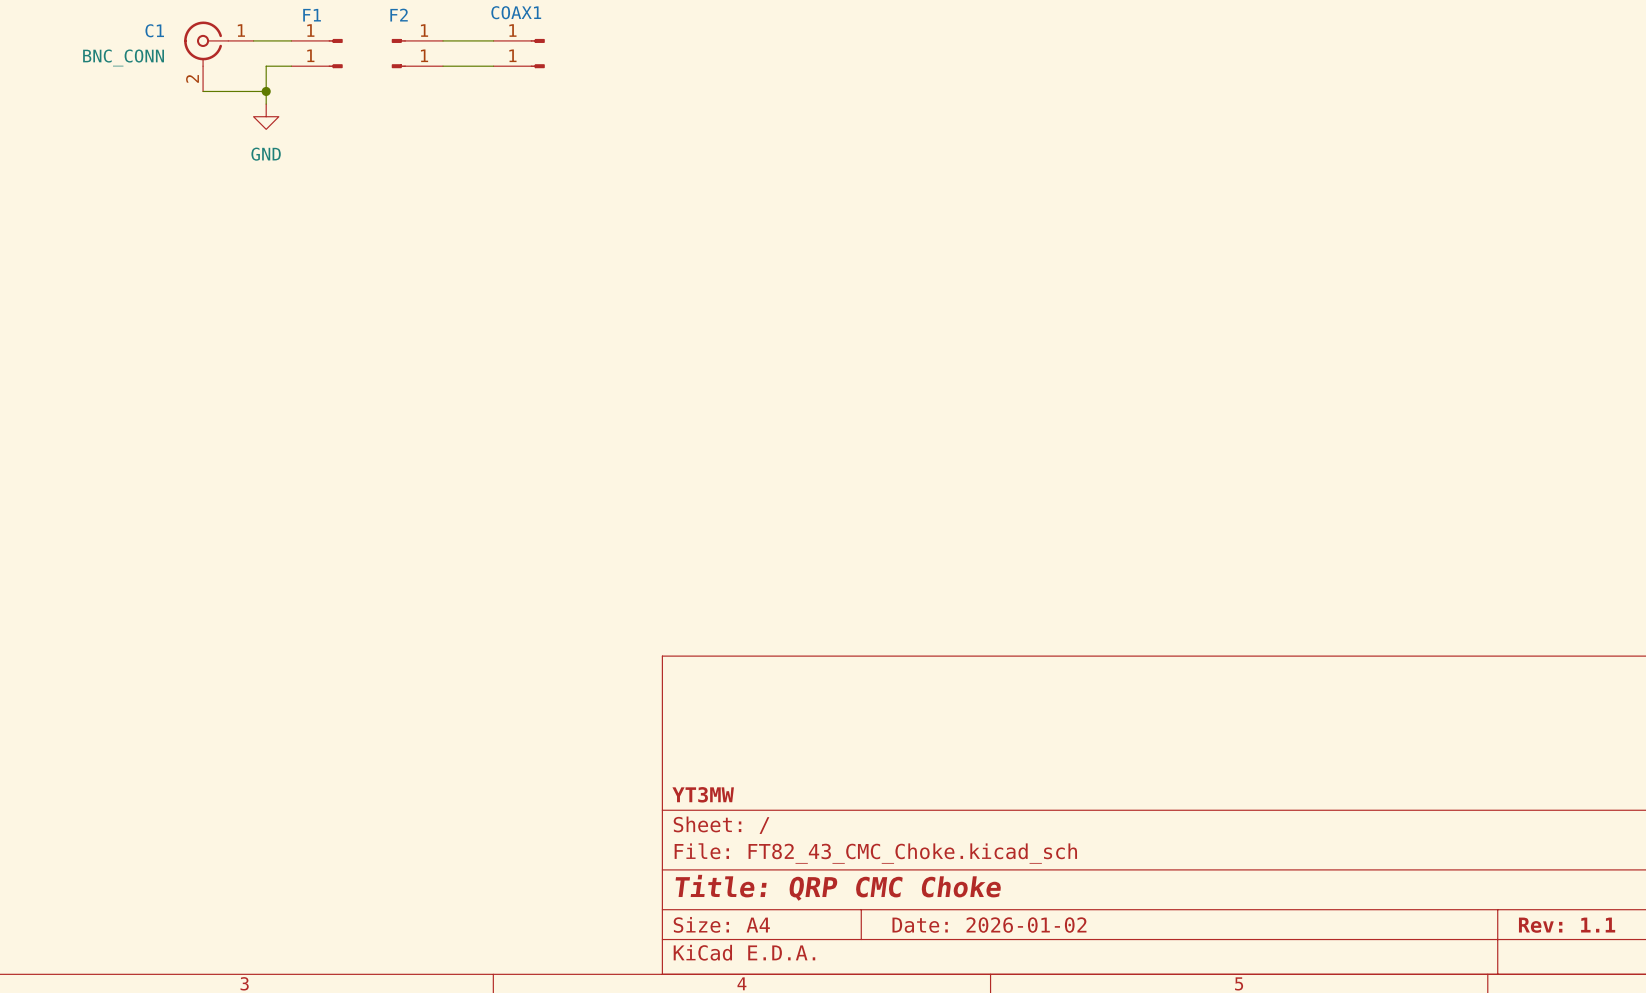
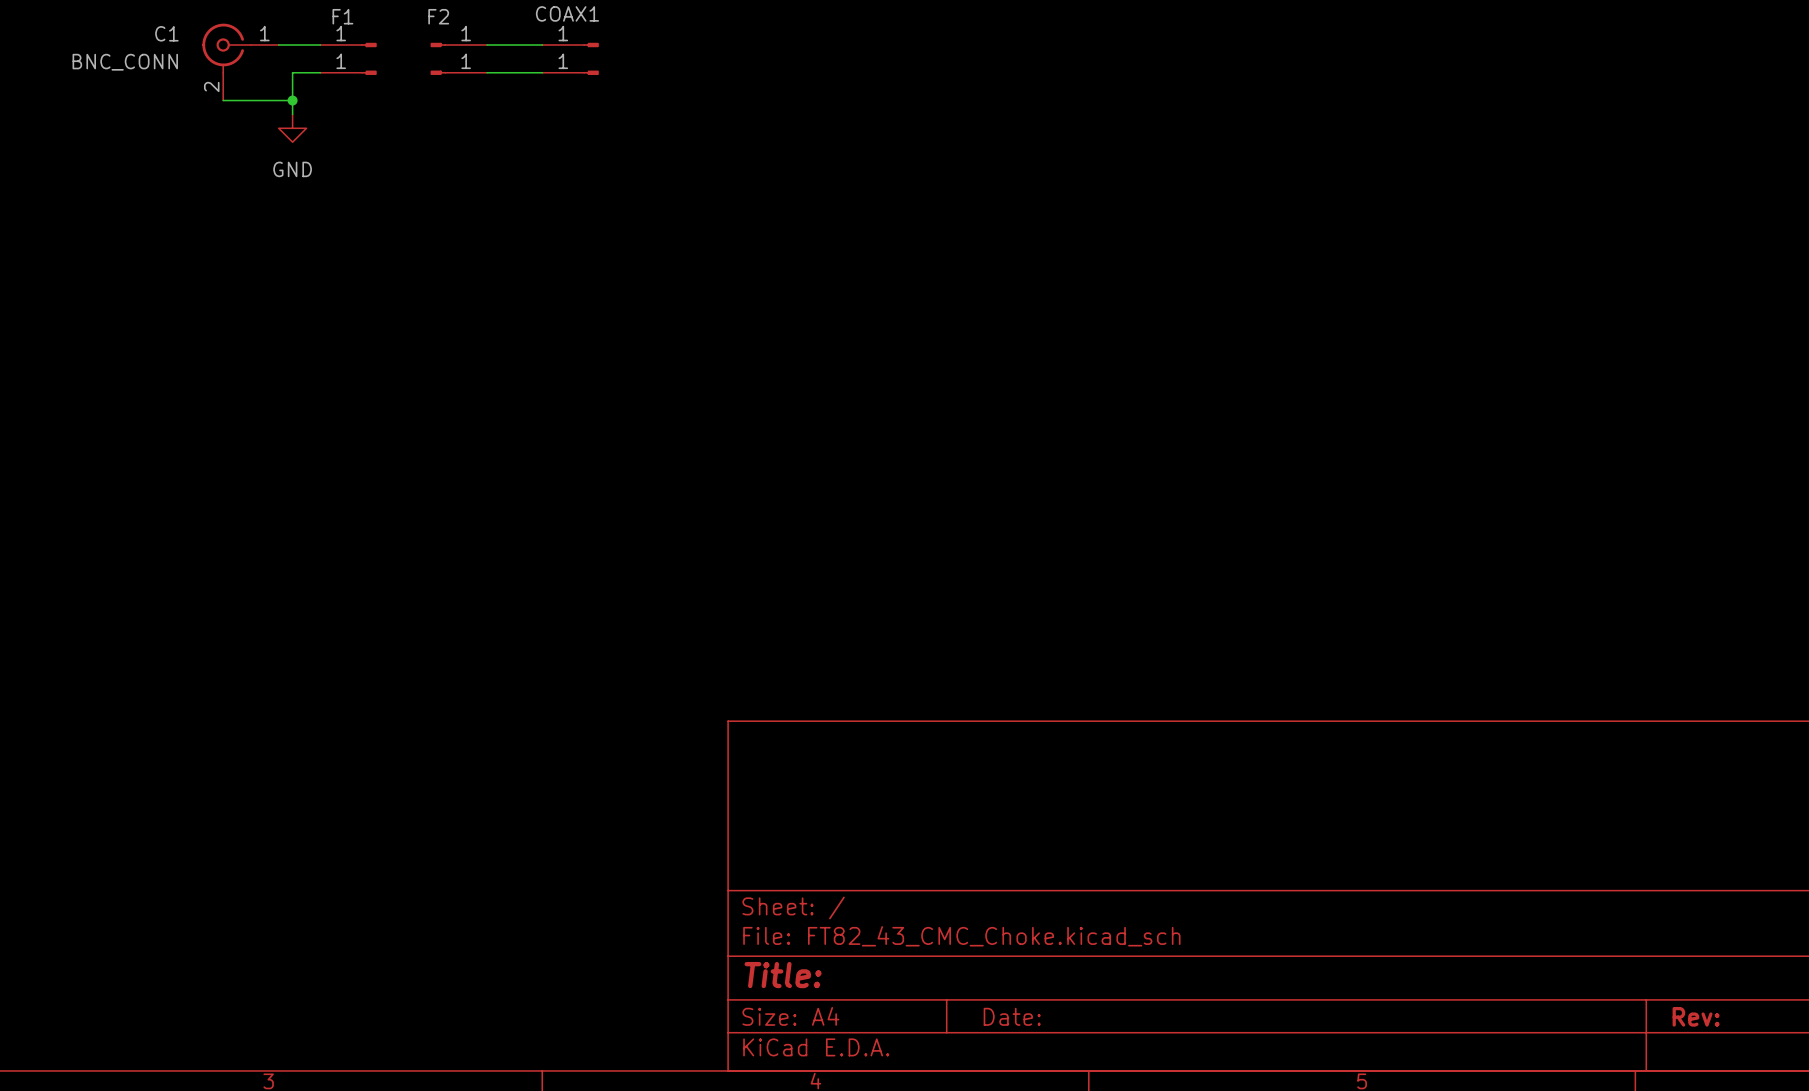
title block: YT3MW (703, 794) -> none
title block: Title: QRP CMC Choke (838, 887) -> Title: (783, 975)
title block: Date: 2026-01-02 (989, 925) -> Date: (1012, 1016)
title block: Rev: 1.1 (1567, 925) -> Rev: (1696, 1016)

